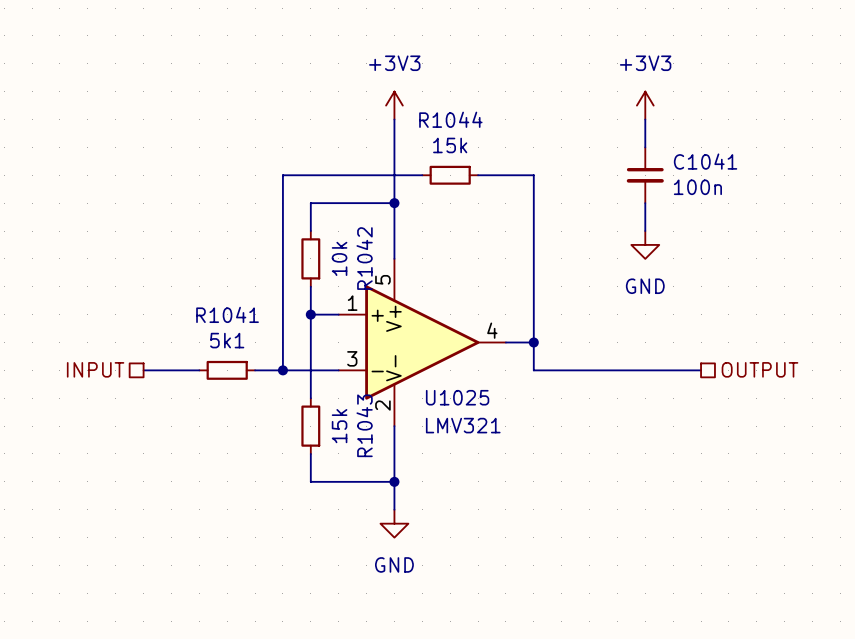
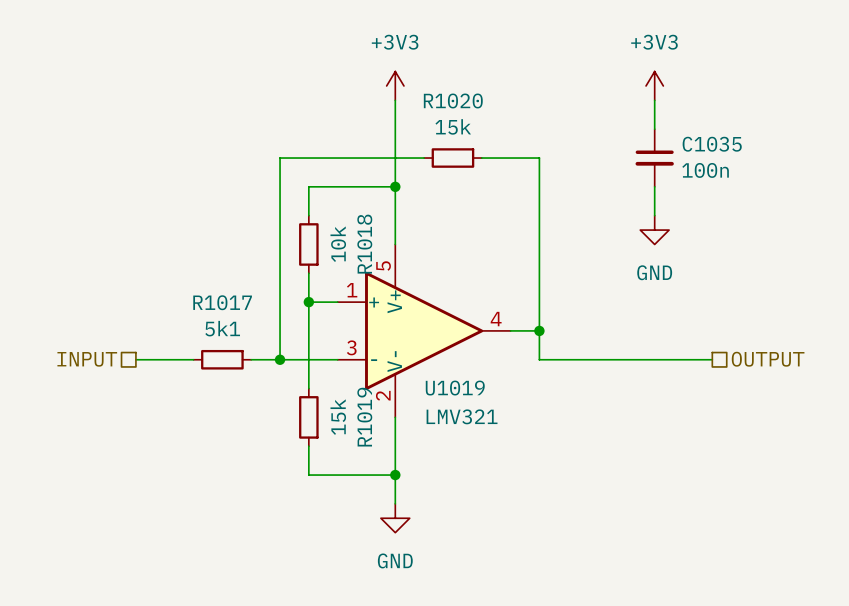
R1044 name: R1044 (450, 119) -> R1020 (453, 100)
C1041 name: C1041 (705, 161) -> C1035 (712, 144)
R1042 name: R1042 (364, 258) -> R1018 (364, 244)
R1041 name: R1041 (227, 314) -> R1017 (222, 302)
U1025 name: U1025 (457, 397) -> U1019 (455, 388)
R1043 name: R1043 (364, 425) -> R1019 (364, 417)

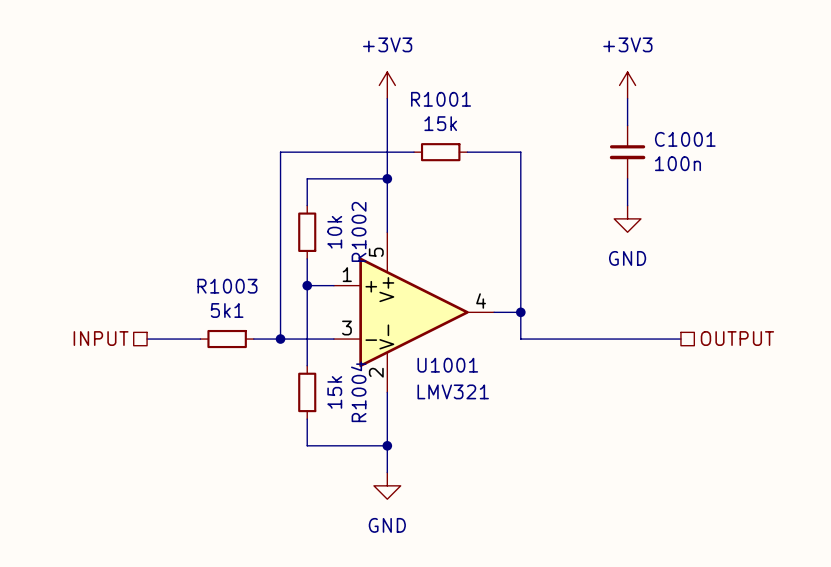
R1020 name: R1020 (453, 100) -> R1001 (441, 99)
C1035 name: C1035 (712, 144) -> C1001 (685, 139)
R1018 name: R1018 (364, 244) -> R1002 (359, 231)
R1017 name: R1017 (222, 302) -> R1003 (227, 286)
U1019 name: U1019 (455, 388) -> U1001 (447, 365)
R1019 name: R1019 (364, 417) -> R1004 (358, 391)

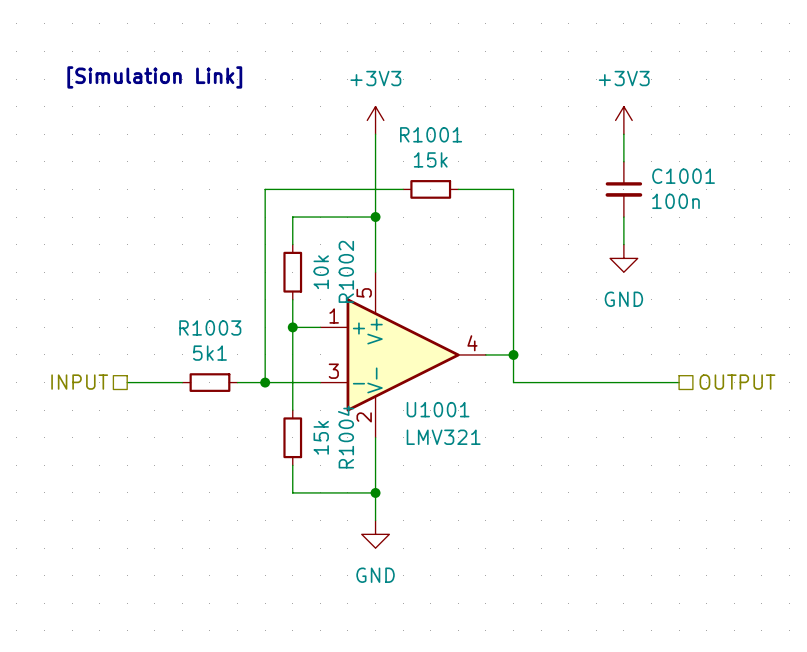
text: none -> [Simulation Link] (154, 77)

